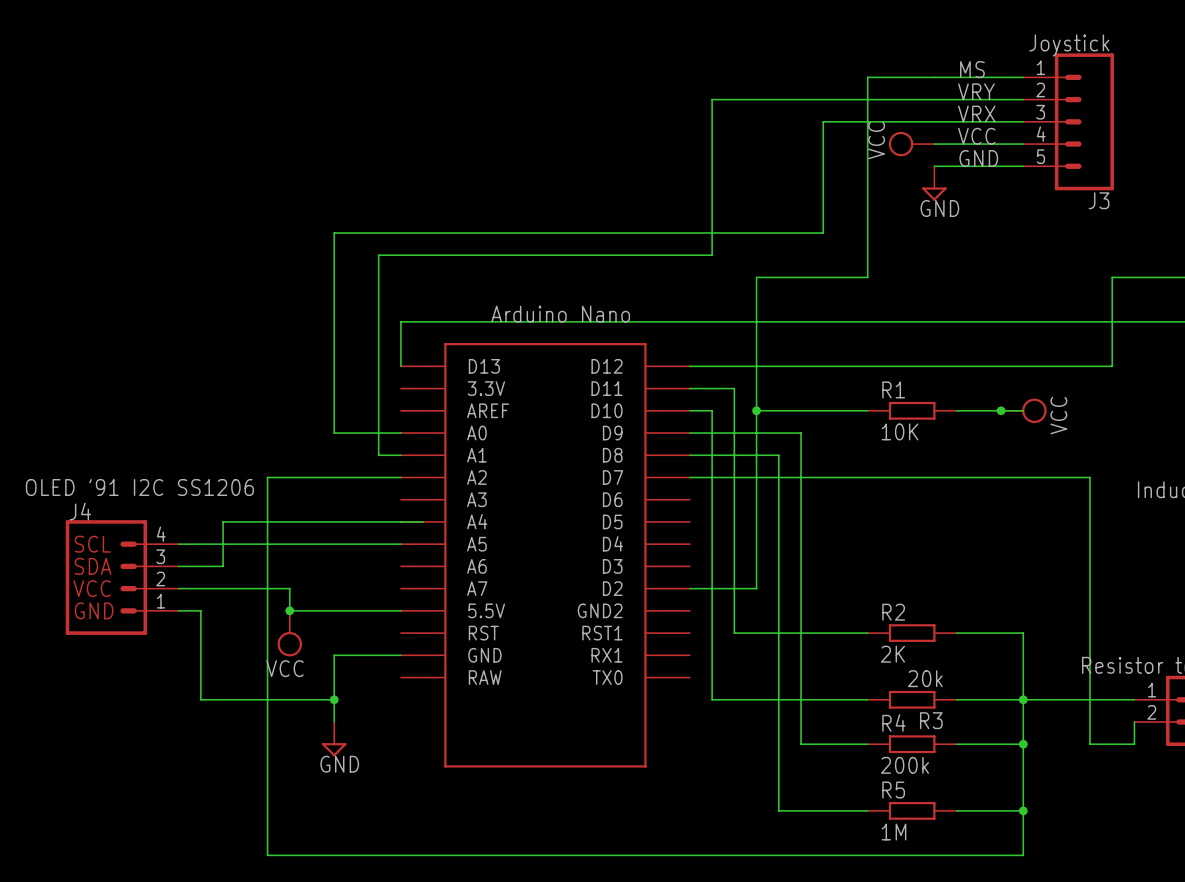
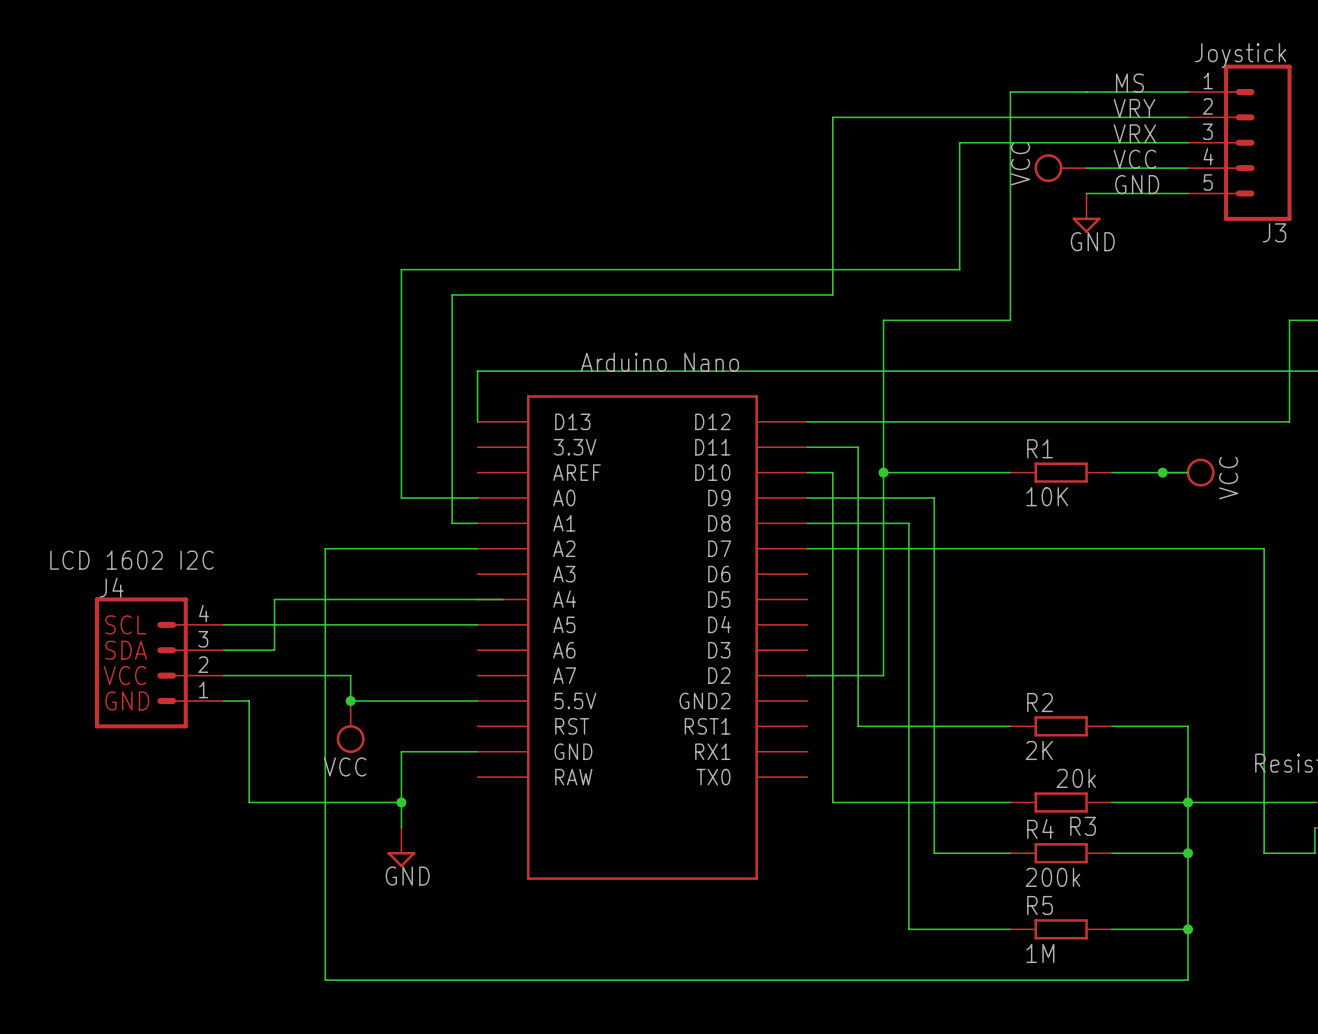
J4 value: OLED '91 I2C SS1206 (139, 487) -> LCD 1602 I2C (131, 560)

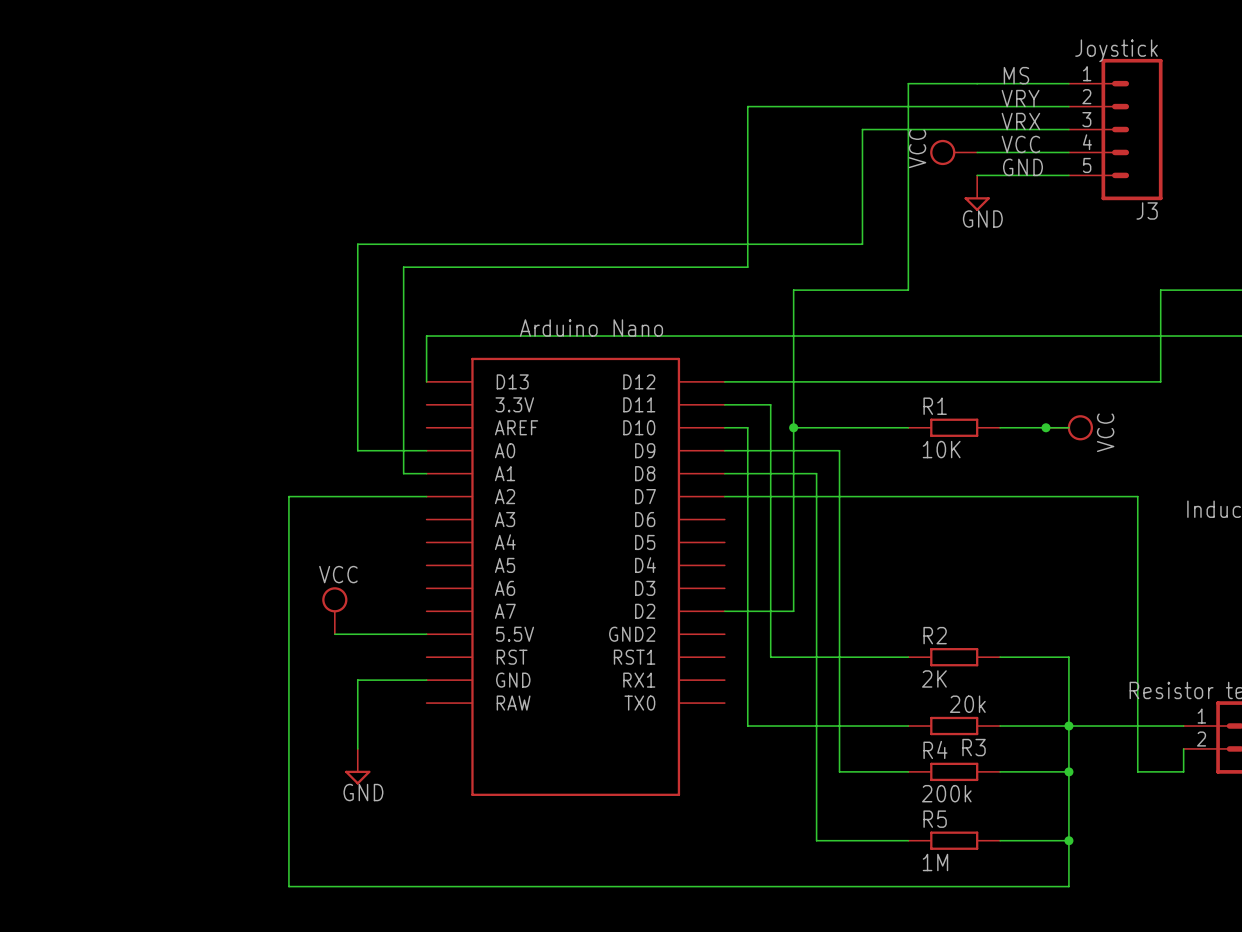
wire: (502, 599) (274, 599) (274, 650) (223, 650) -> none
wire: (223, 624) (477, 624) -> none
J4: LCD 1602 I2C (159, 662) -> none
wire: (223, 675) (350, 675) (350, 700) (376, 700) -> none
wire: (223, 700) (249, 700) (249, 802) (401, 802) -> none
junction: (350, 700) -> none
power symbol position: VCC (350, 727) -> VCC (334, 610)
power symbol rotation: 0° (350, 739) -> 180° (334, 599)
junction: (401, 802) -> none

